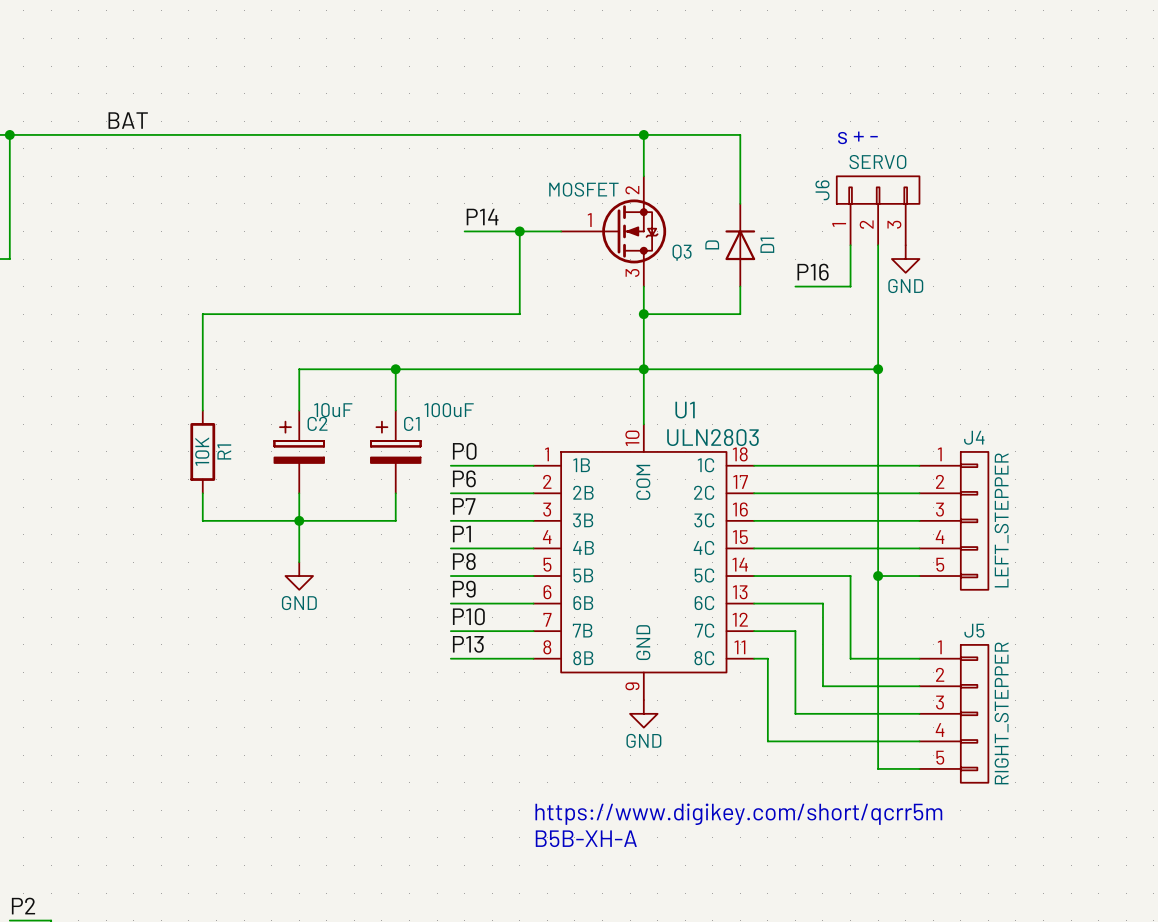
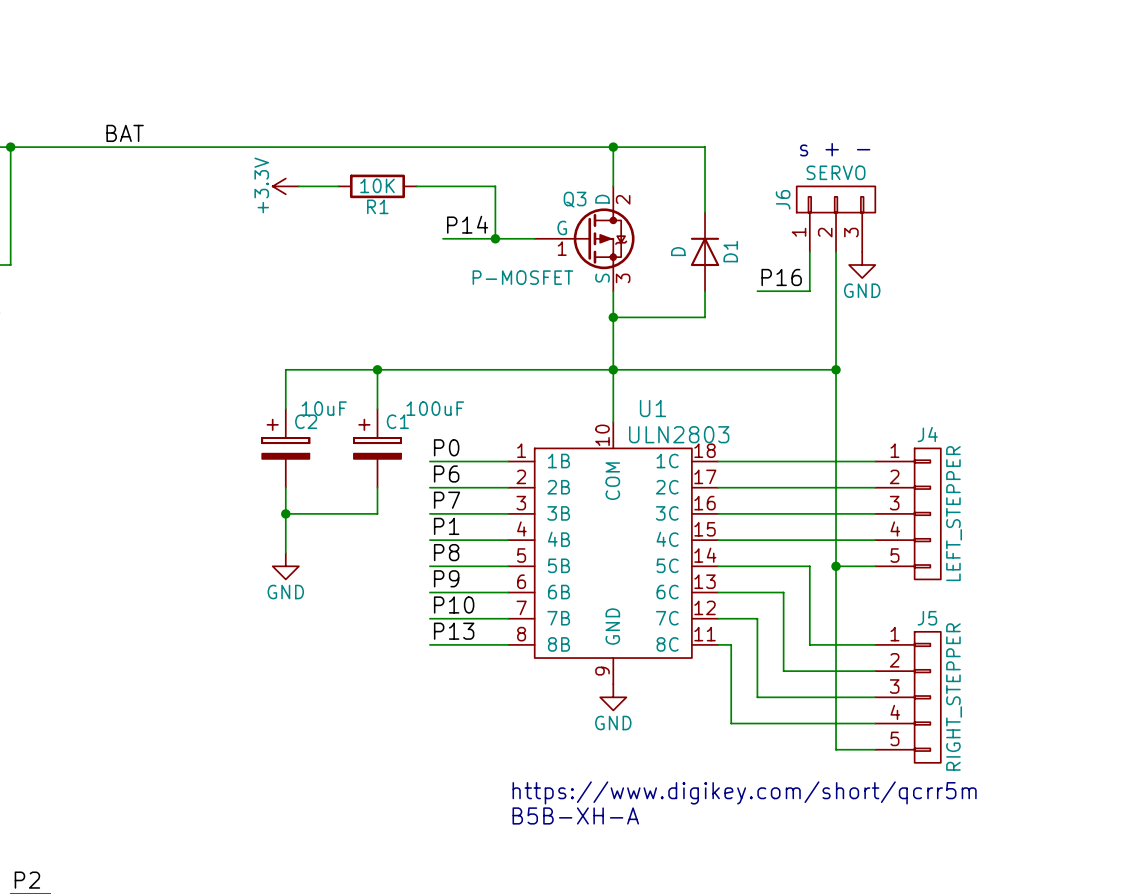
power symbol: none -> +3.3V (285, 186)
wire: none -> (298, 186) (338, 186)
Q3 symbol: [561, 176, 667, 287] -> [534, 186, 635, 292]
Q3 value: MOSFET (583, 189) -> P-MOSFET (522, 277)
wire: (519, 231) (519, 314) (202, 314) (202, 410) -> (495, 238) (495, 186) (416, 186)
Q3 name position: Q3 (682, 252) -> Q3 (575, 199)
R1 rotation: 0° (202, 451) -> 90° clockwise (377, 186)
R1 position: (202, 451) -> (377, 186)
wire: (202, 493) (202, 520) (299, 520) -> none

